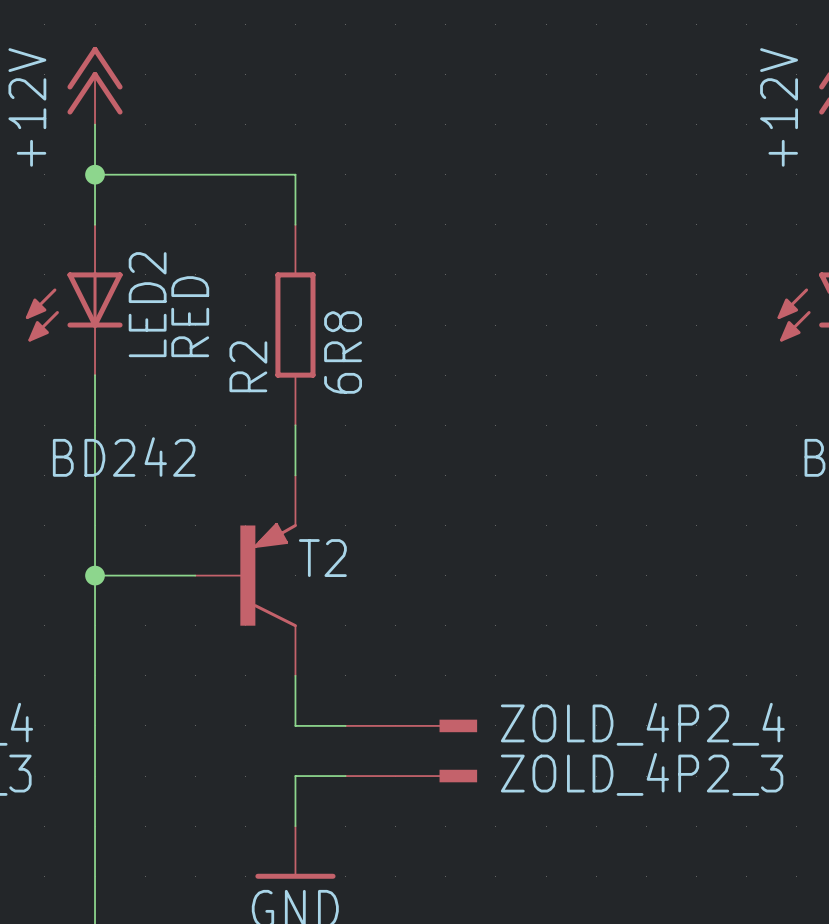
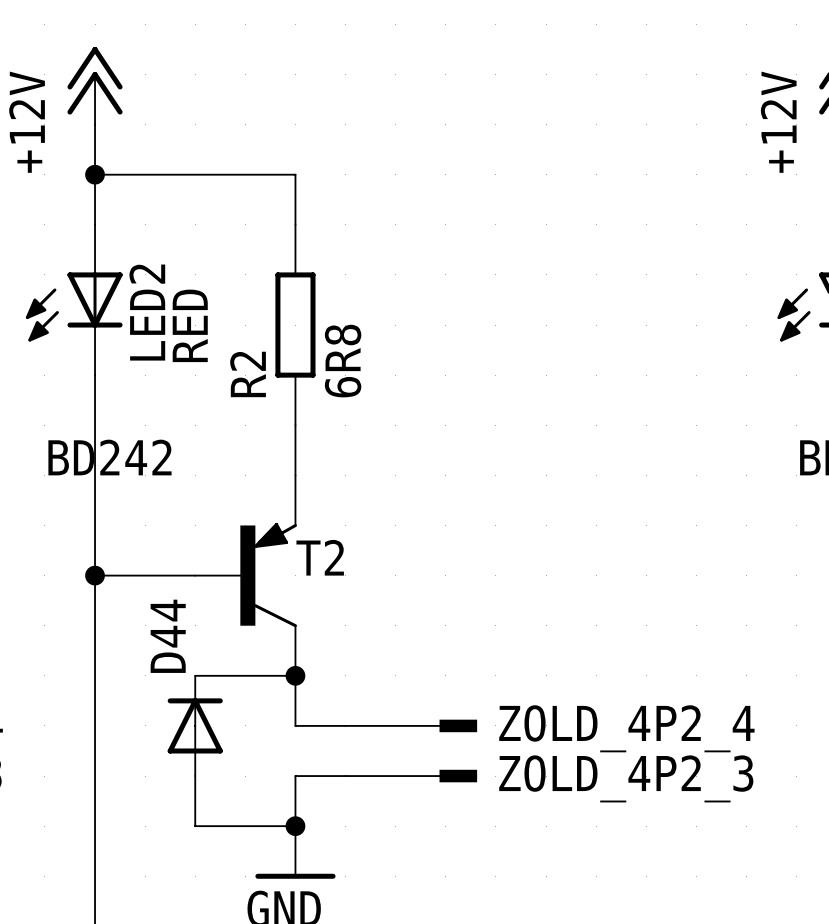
wire: none -> (195, 675) (295, 675)
junction: none -> (295, 675)
D44: none -> (195, 725)
wire: none -> (195, 776) (195, 826) (295, 826)
junction: none -> (295, 826)

